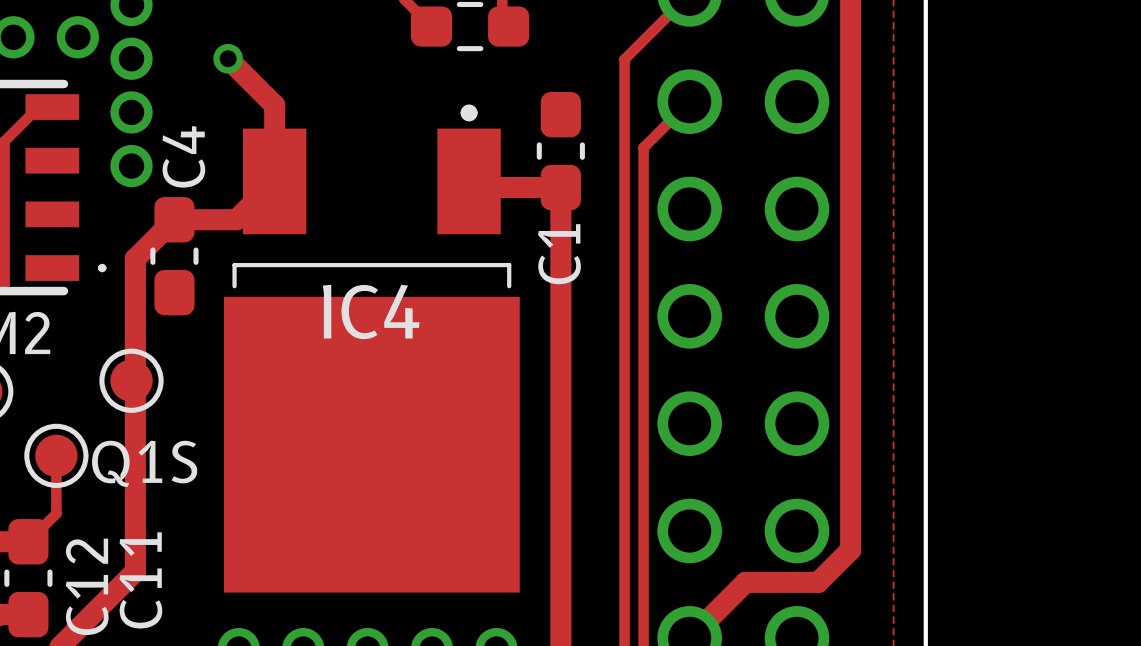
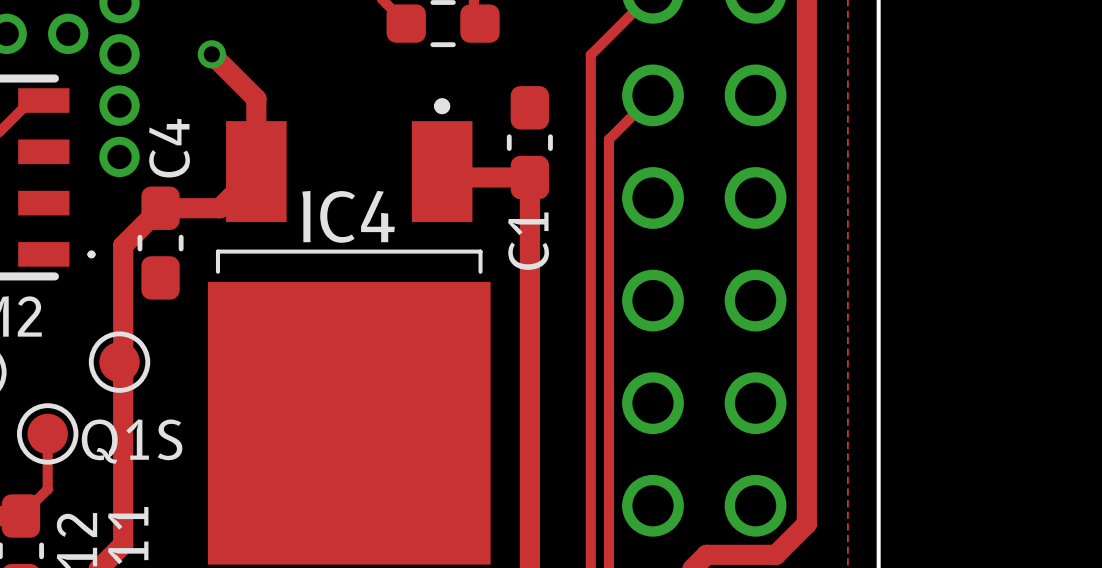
IC4 name position: IC4 (371, 311) -> IC4 (348, 216)

